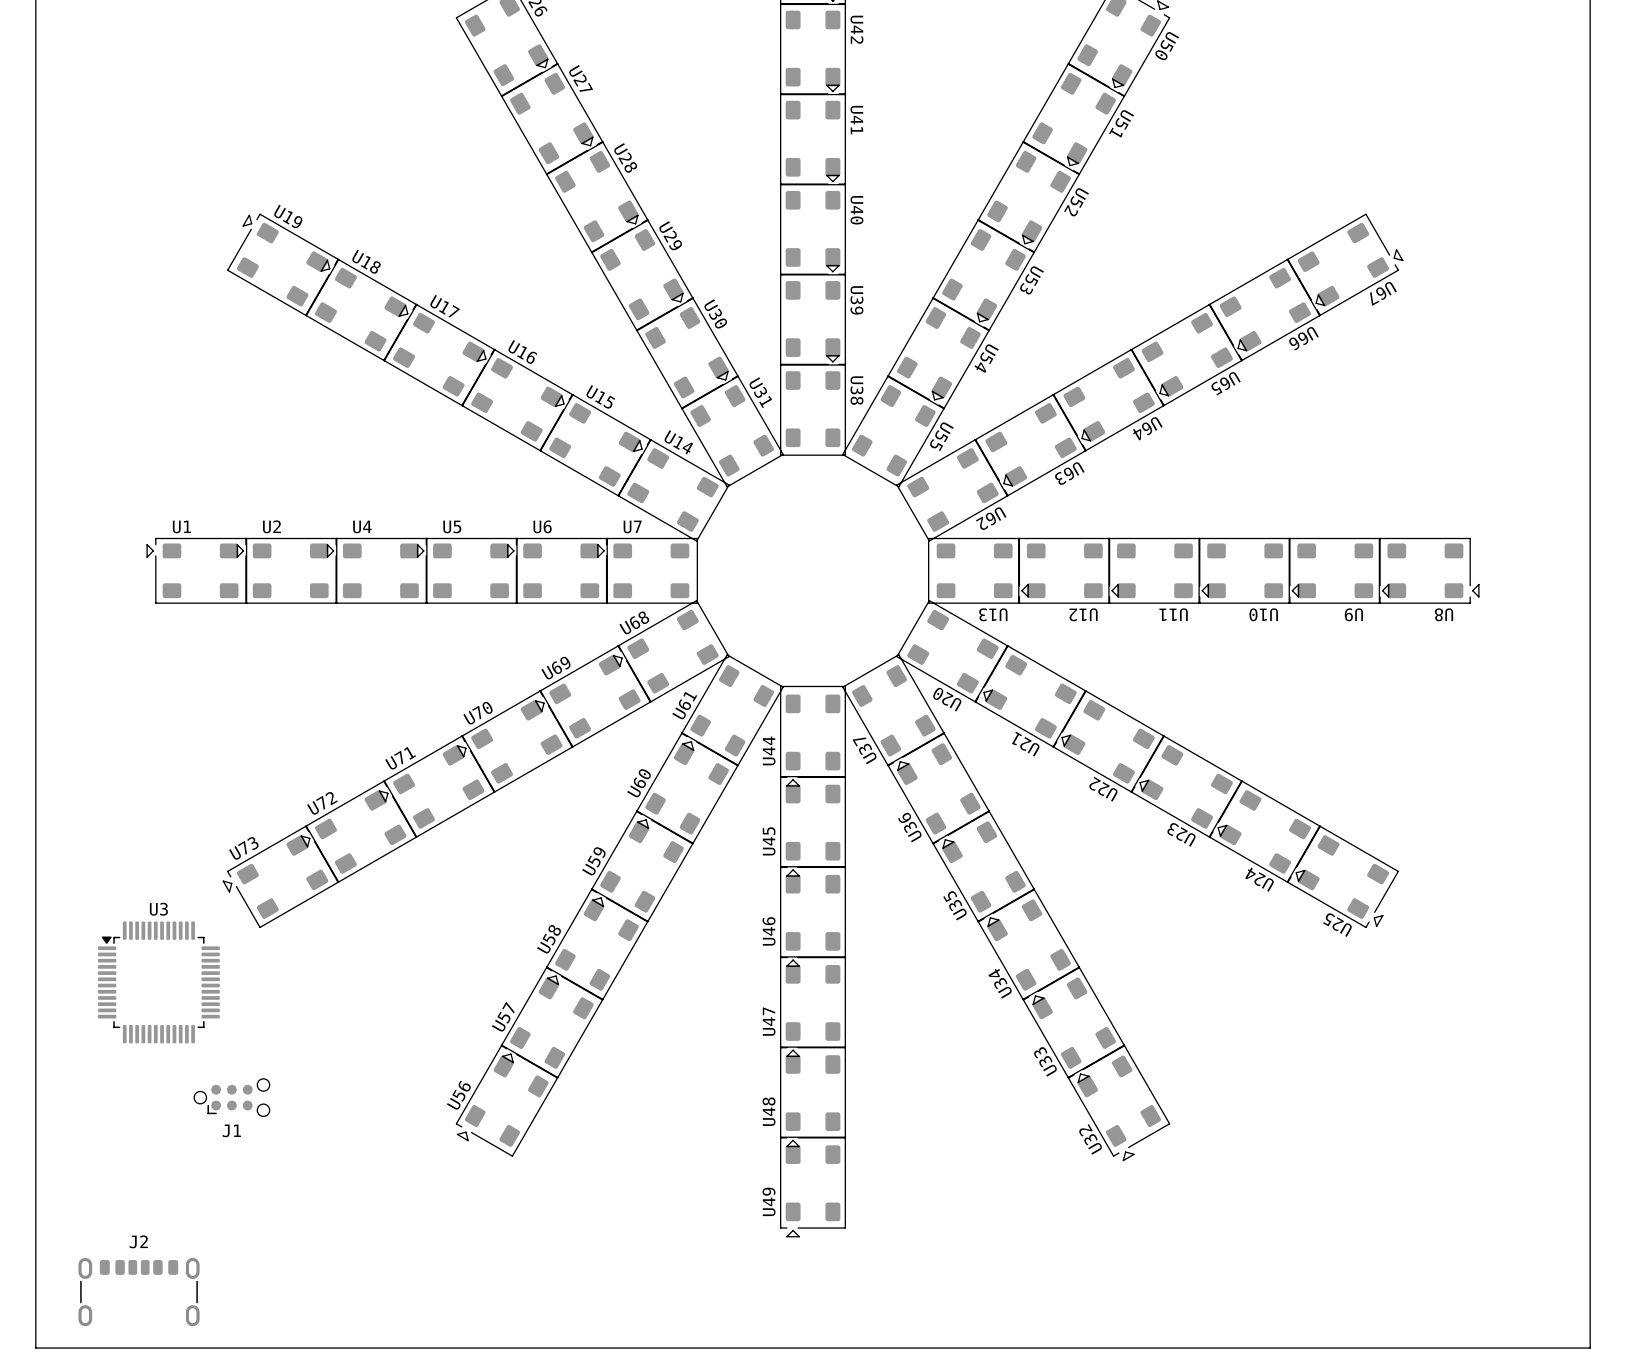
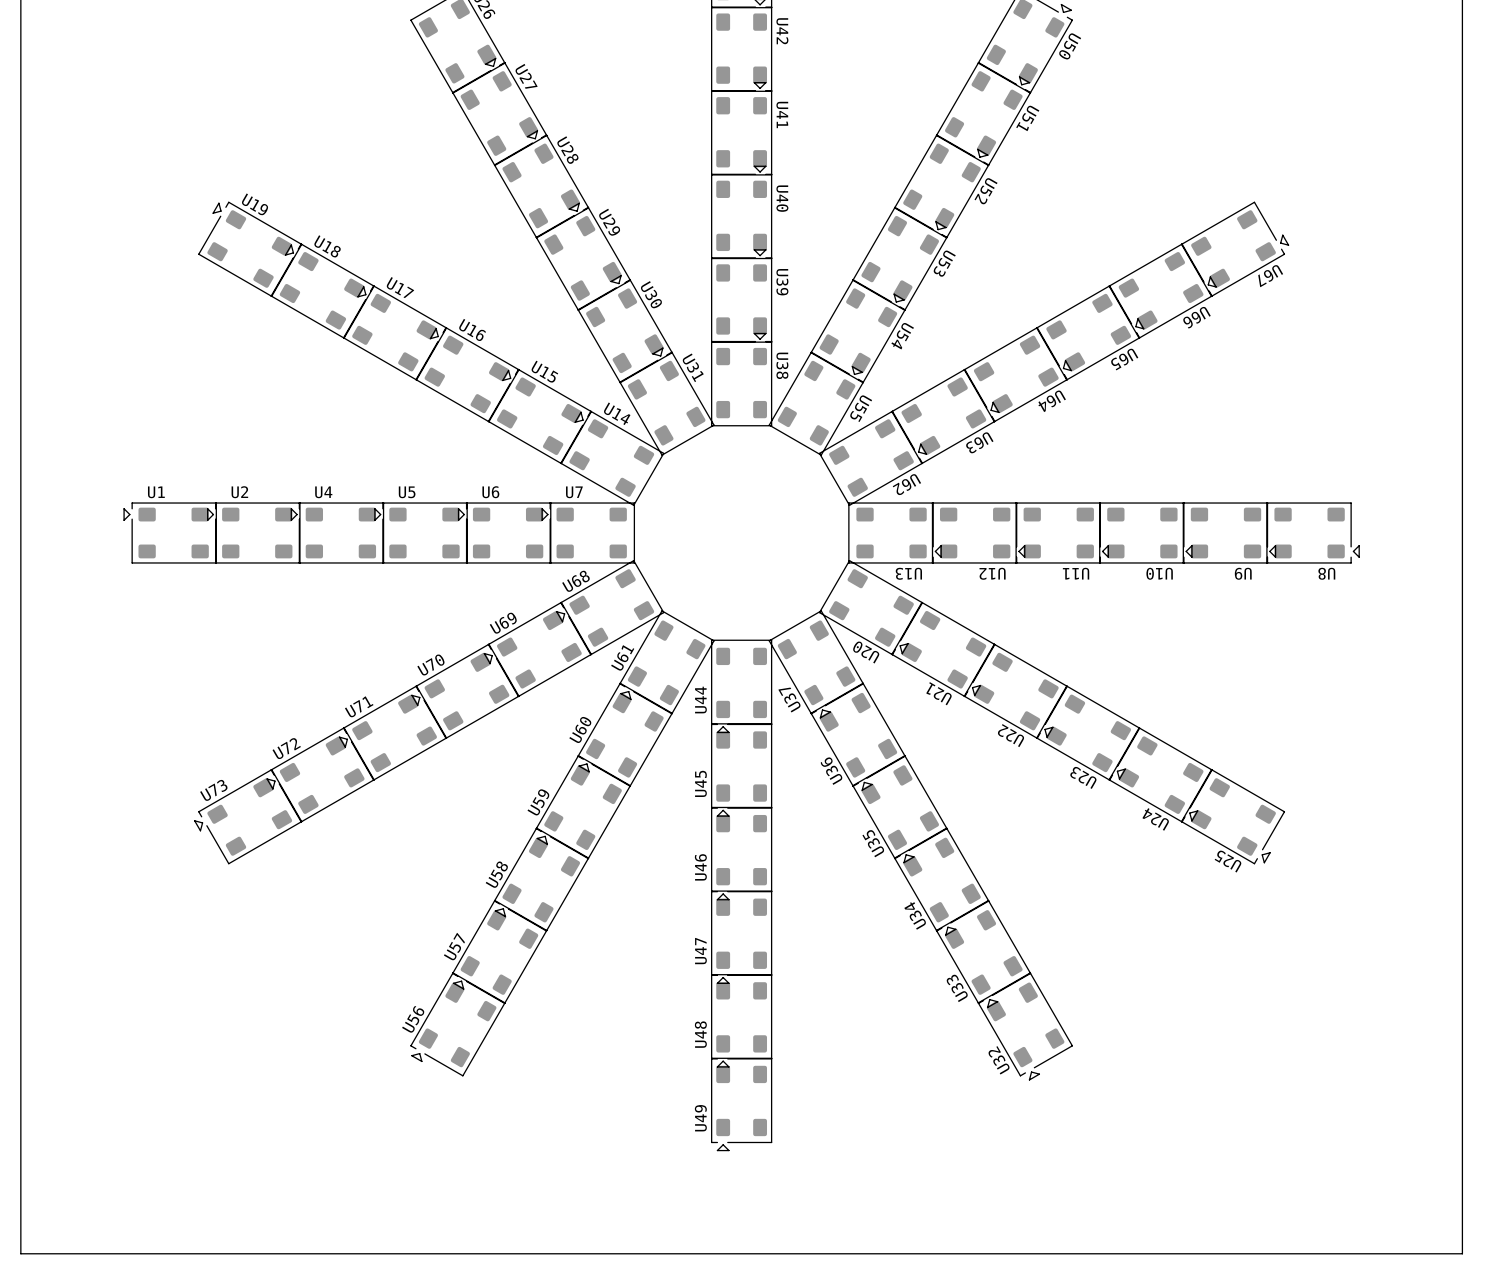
U3: (158, 982) -> none
J1: (231, 1097) -> none
J2: (139, 1292) -> none

